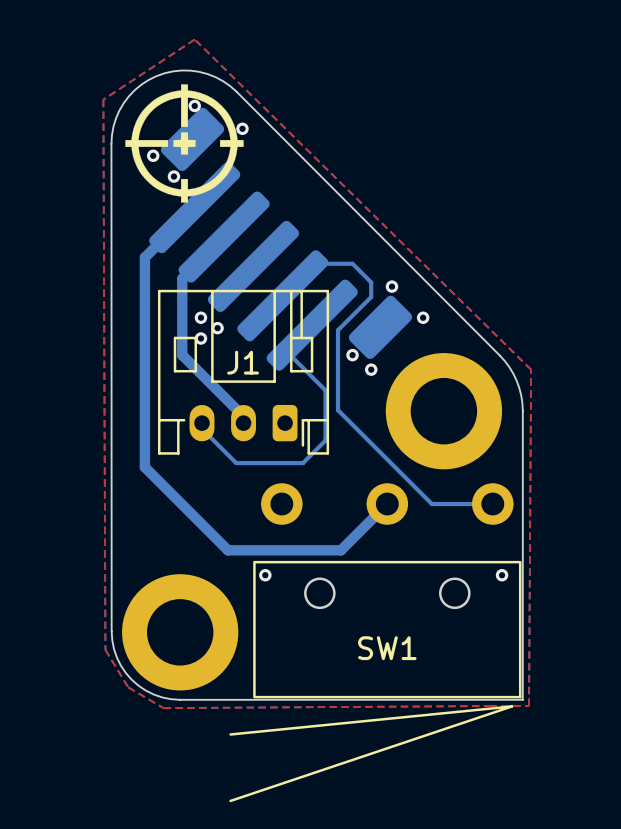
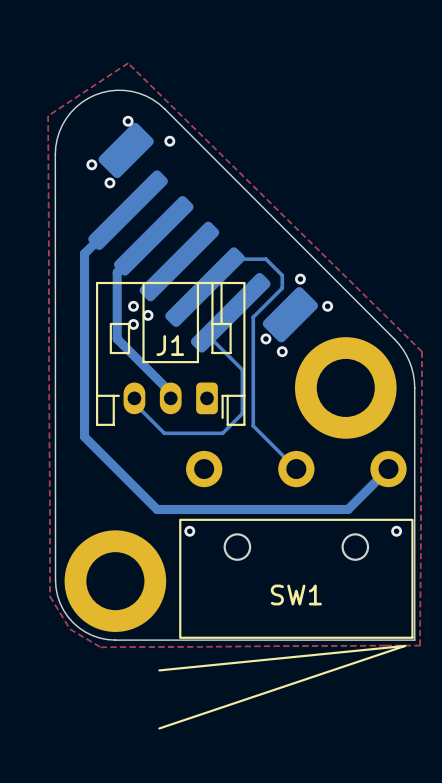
drawing: [125, 84, 244, 203] -> none
bottom track: (338, 410) (431, 504) (492, 504) -> (253, 387) (253, 425) (296, 469)
bottom track: (387, 504) (341, 550) -> (388, 469) (348, 509) (255, 509)

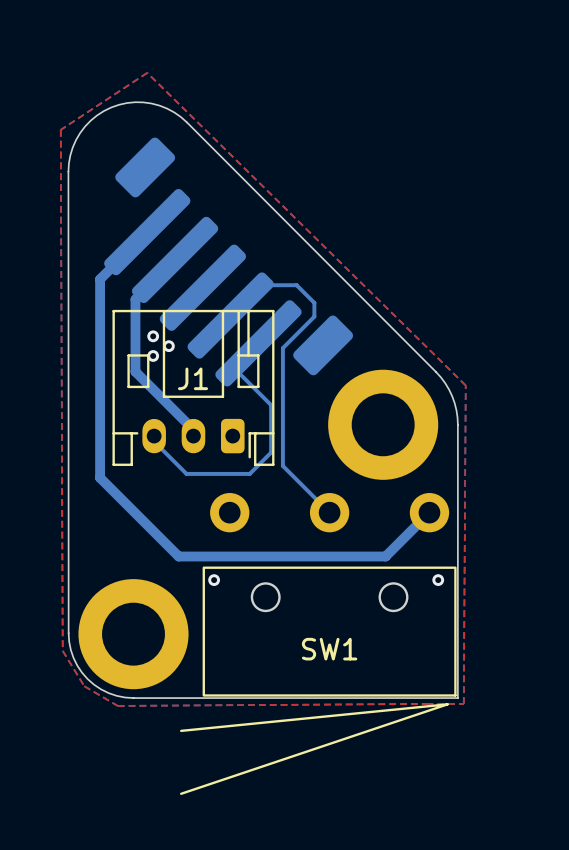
via: (128, 121) -> none
via: (169, 141) -> none
via: (91, 164) -> none
via: (109, 182) -> none
via: (300, 279) -> none
via: (327, 306) -> none
via: (265, 338) -> none
via: (282, 351) -> none

